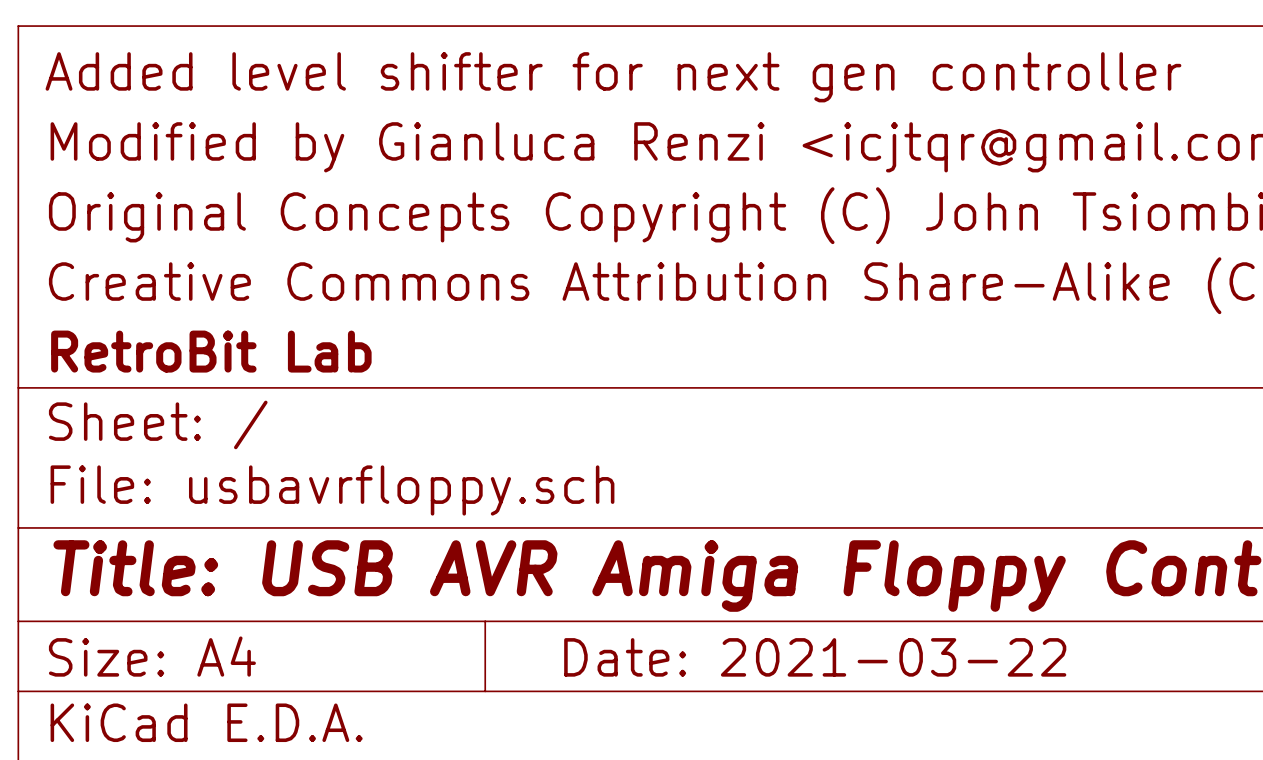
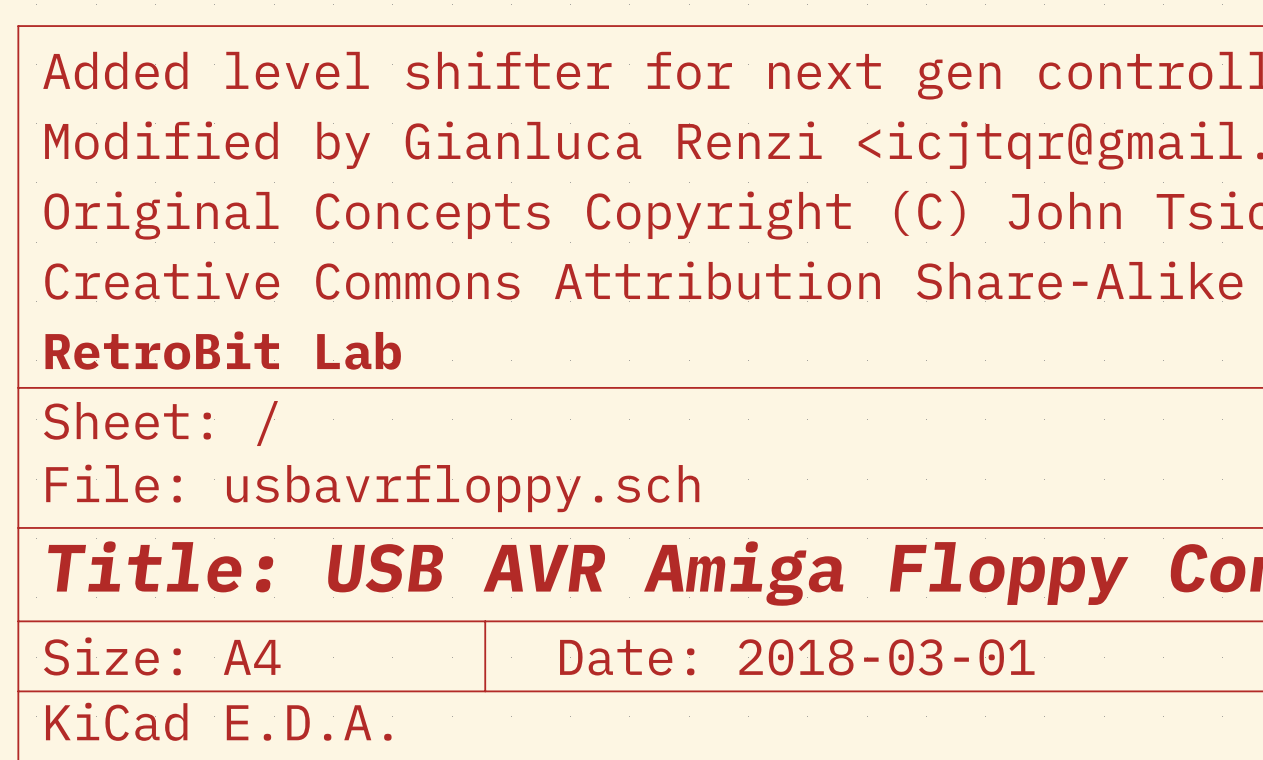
title block: Date: 2021-03-22 (815, 657) -> Date: 2018-03-01 (797, 657)

